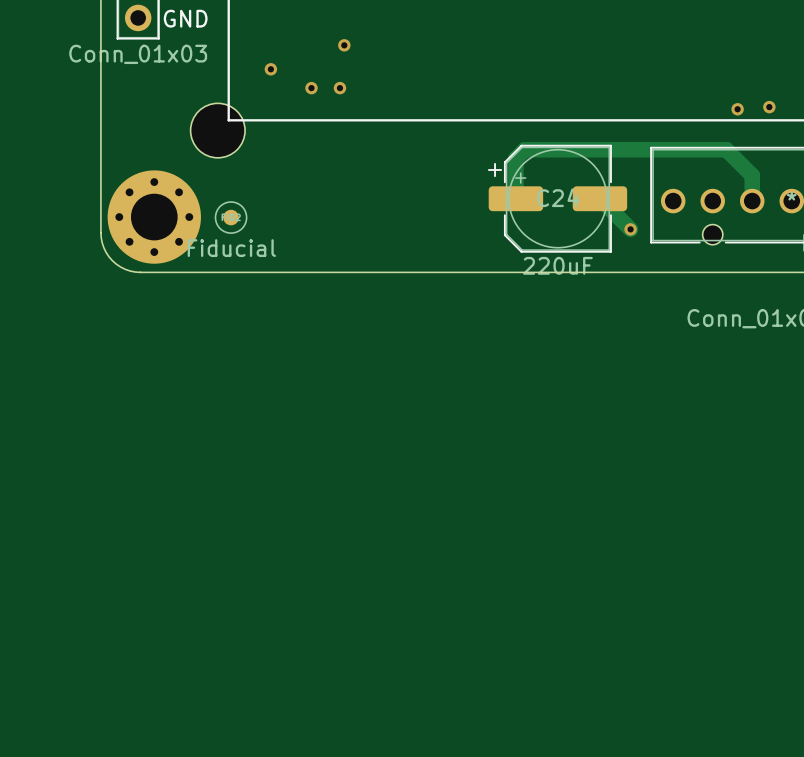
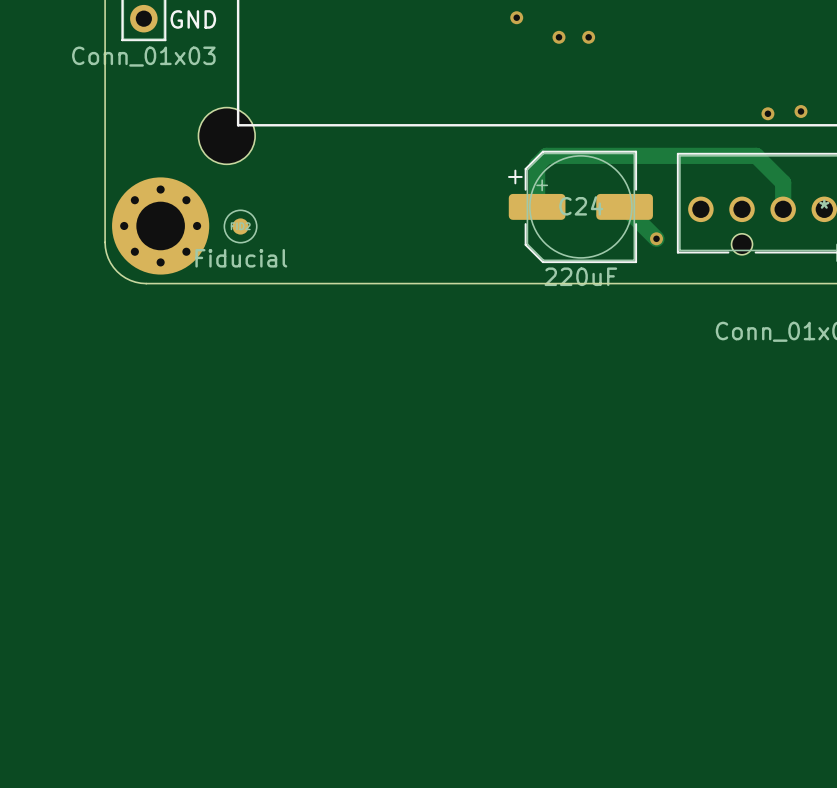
via: none -> (516, 17)
via: none -> (559, 37)
via: none -> (588, 37)
via: (344, 45) -> none
via: (270, 69) -> none
via: (311, 88) -> none
via: (339, 88) -> none

